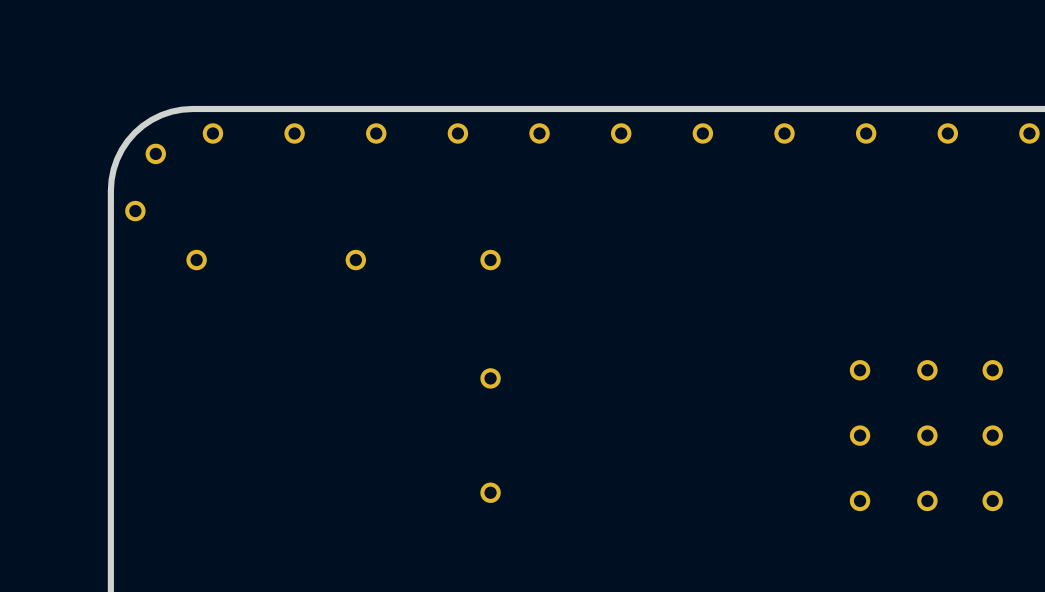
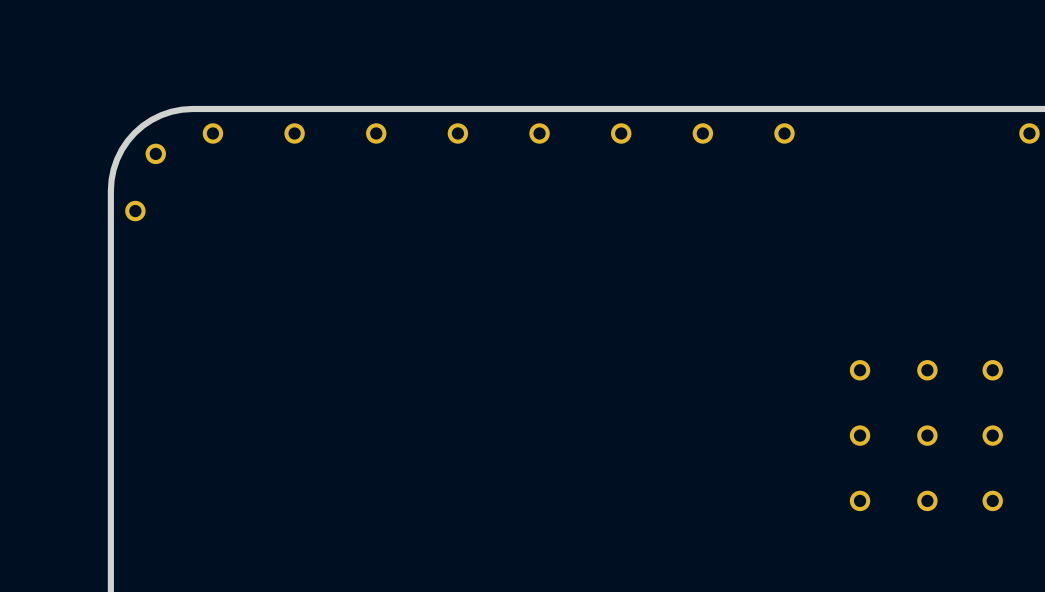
part: (866, 133) -> none
part: (947, 133) -> none
part: (196, 260) -> none
part: (355, 260) -> none
part: (490, 260) -> none
part: (490, 378) -> none
part: (490, 492) -> none

